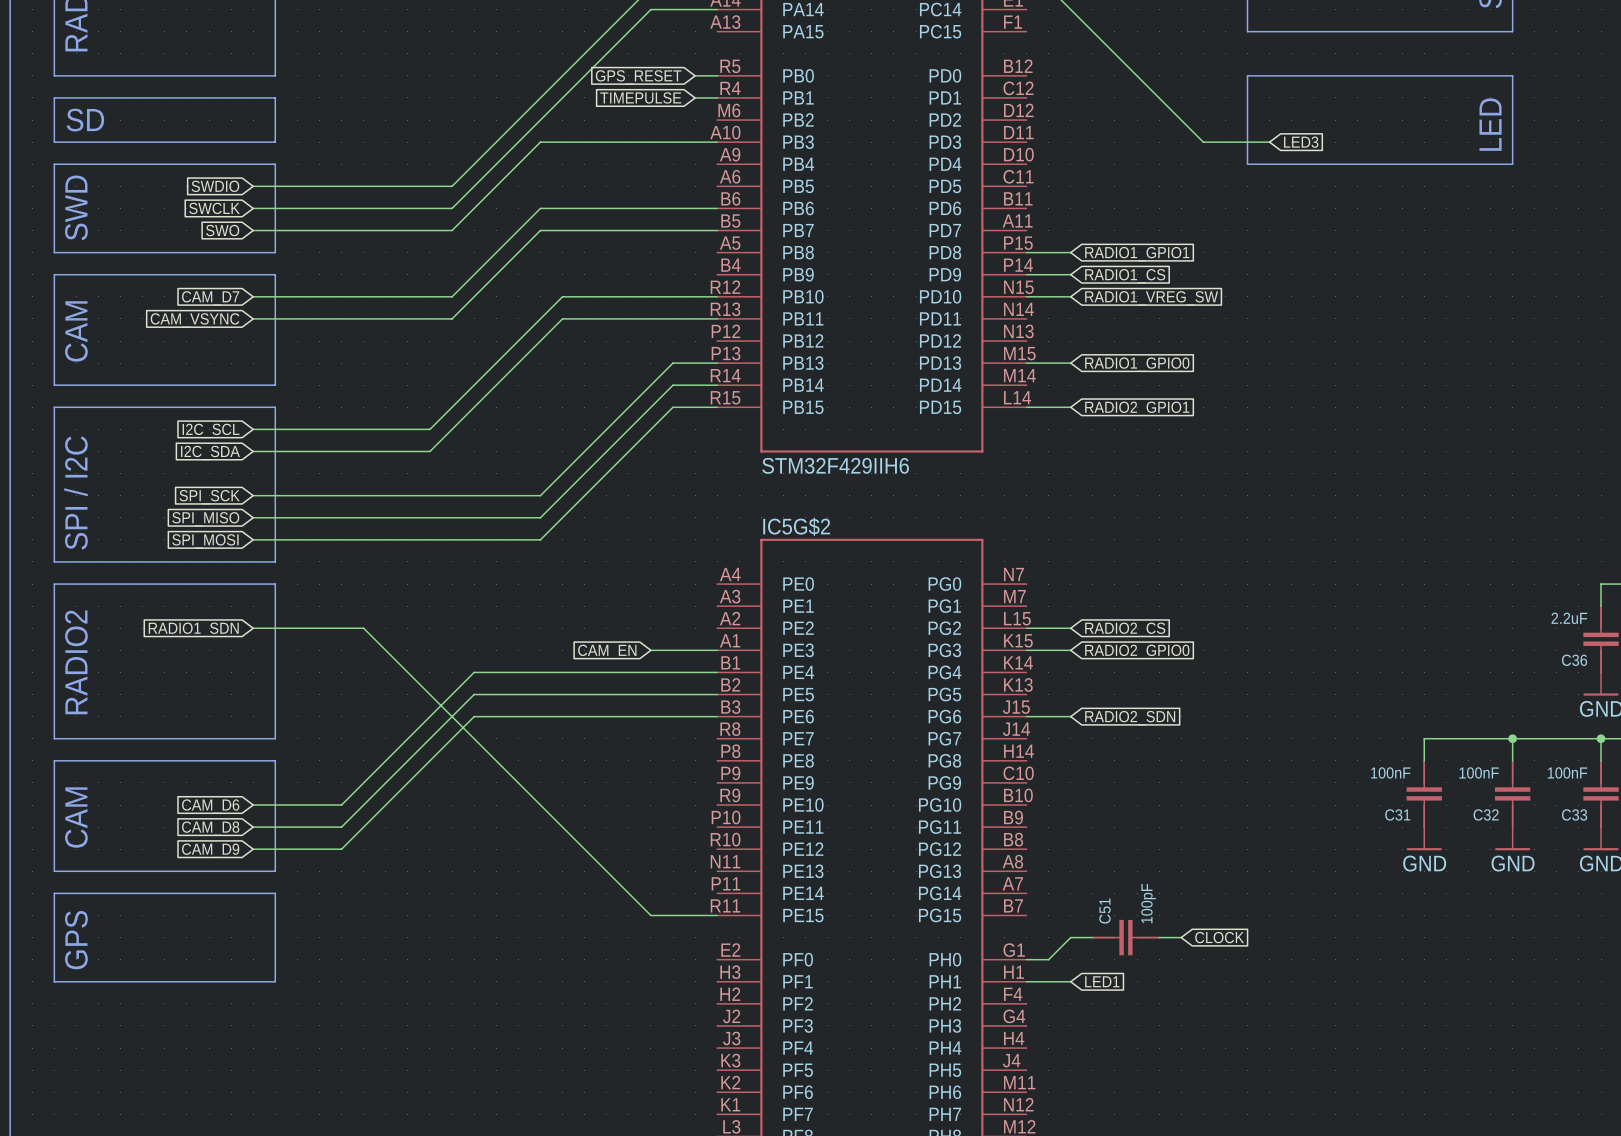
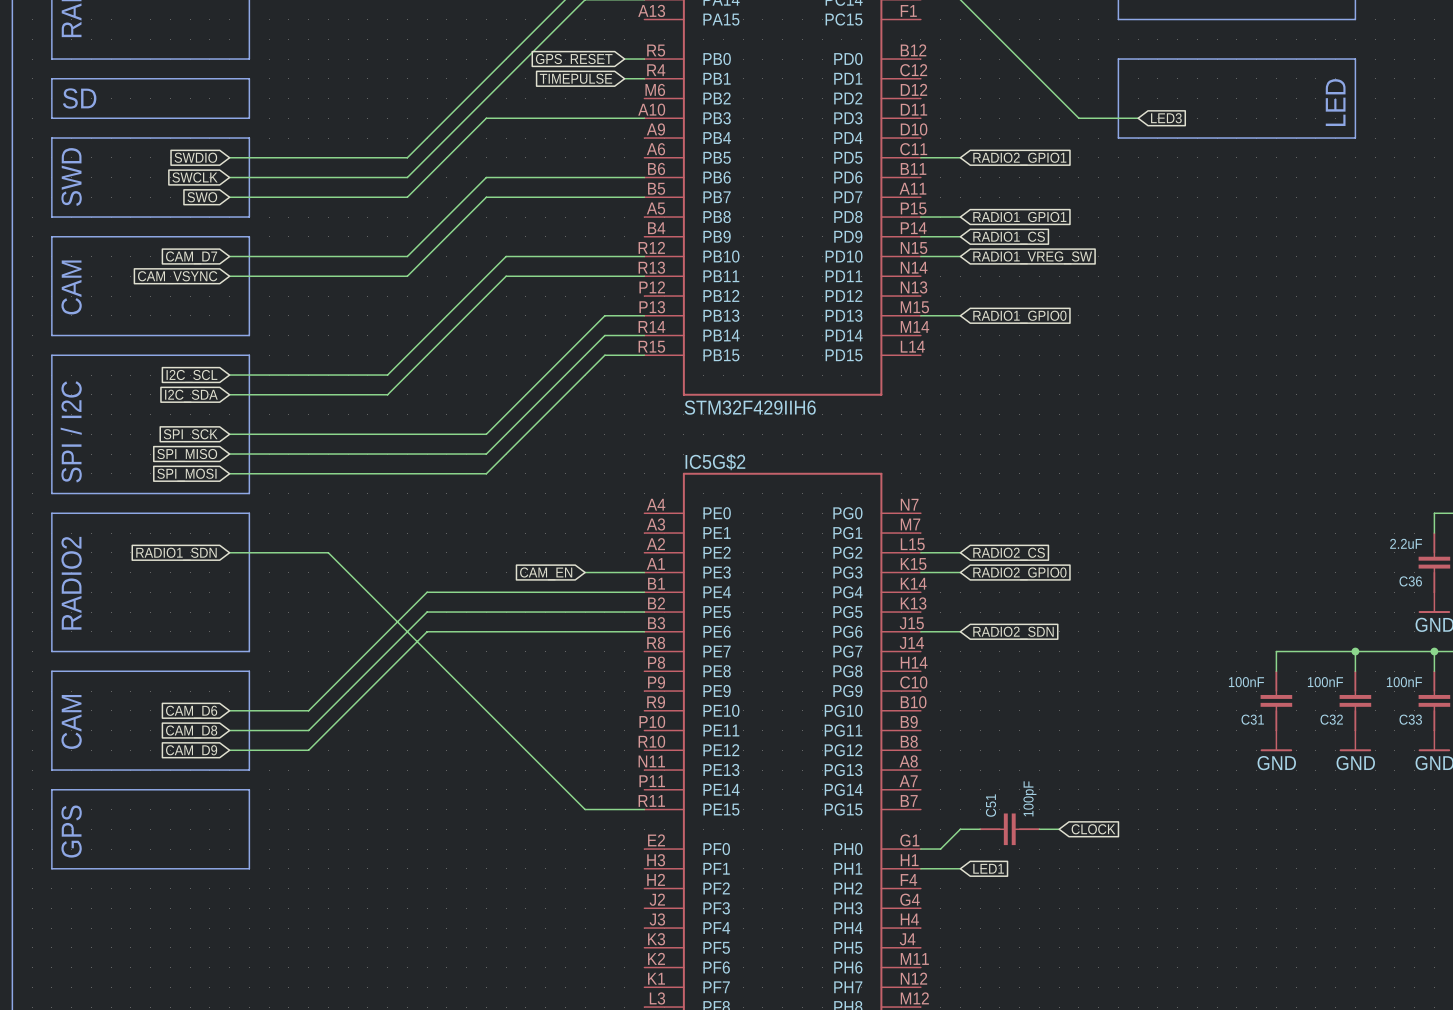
wire: none -> (920, 157) (960, 157)
global label: none -> RADIO2_GPIO1 (1019, 159)
wire: (1026, 407) (1070, 407) -> none
global label: RADIO2_GPIO1 (1137, 408) -> none

